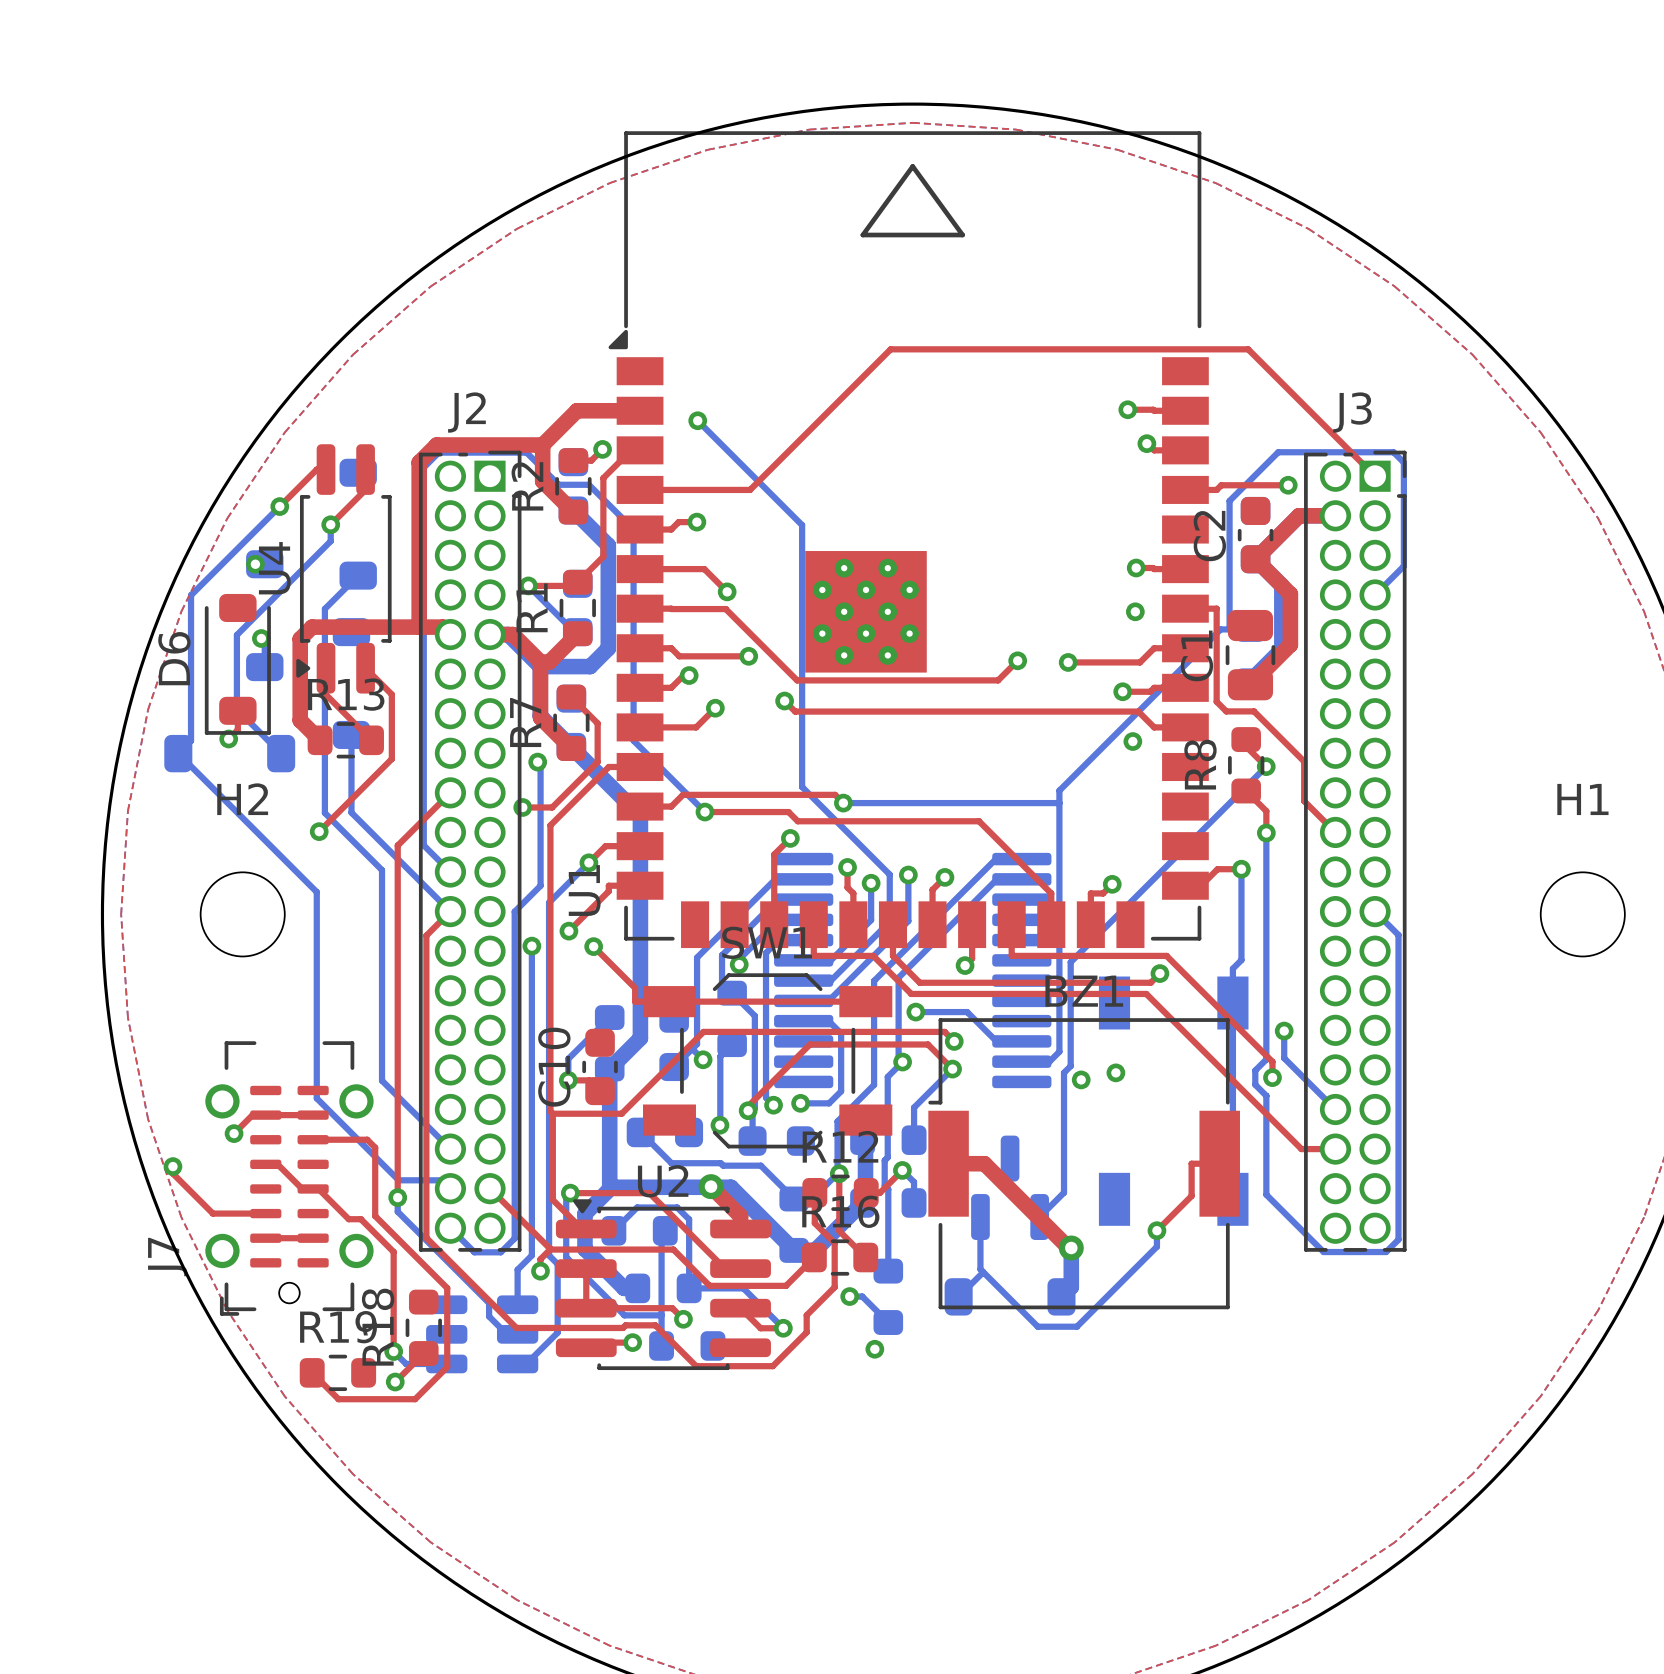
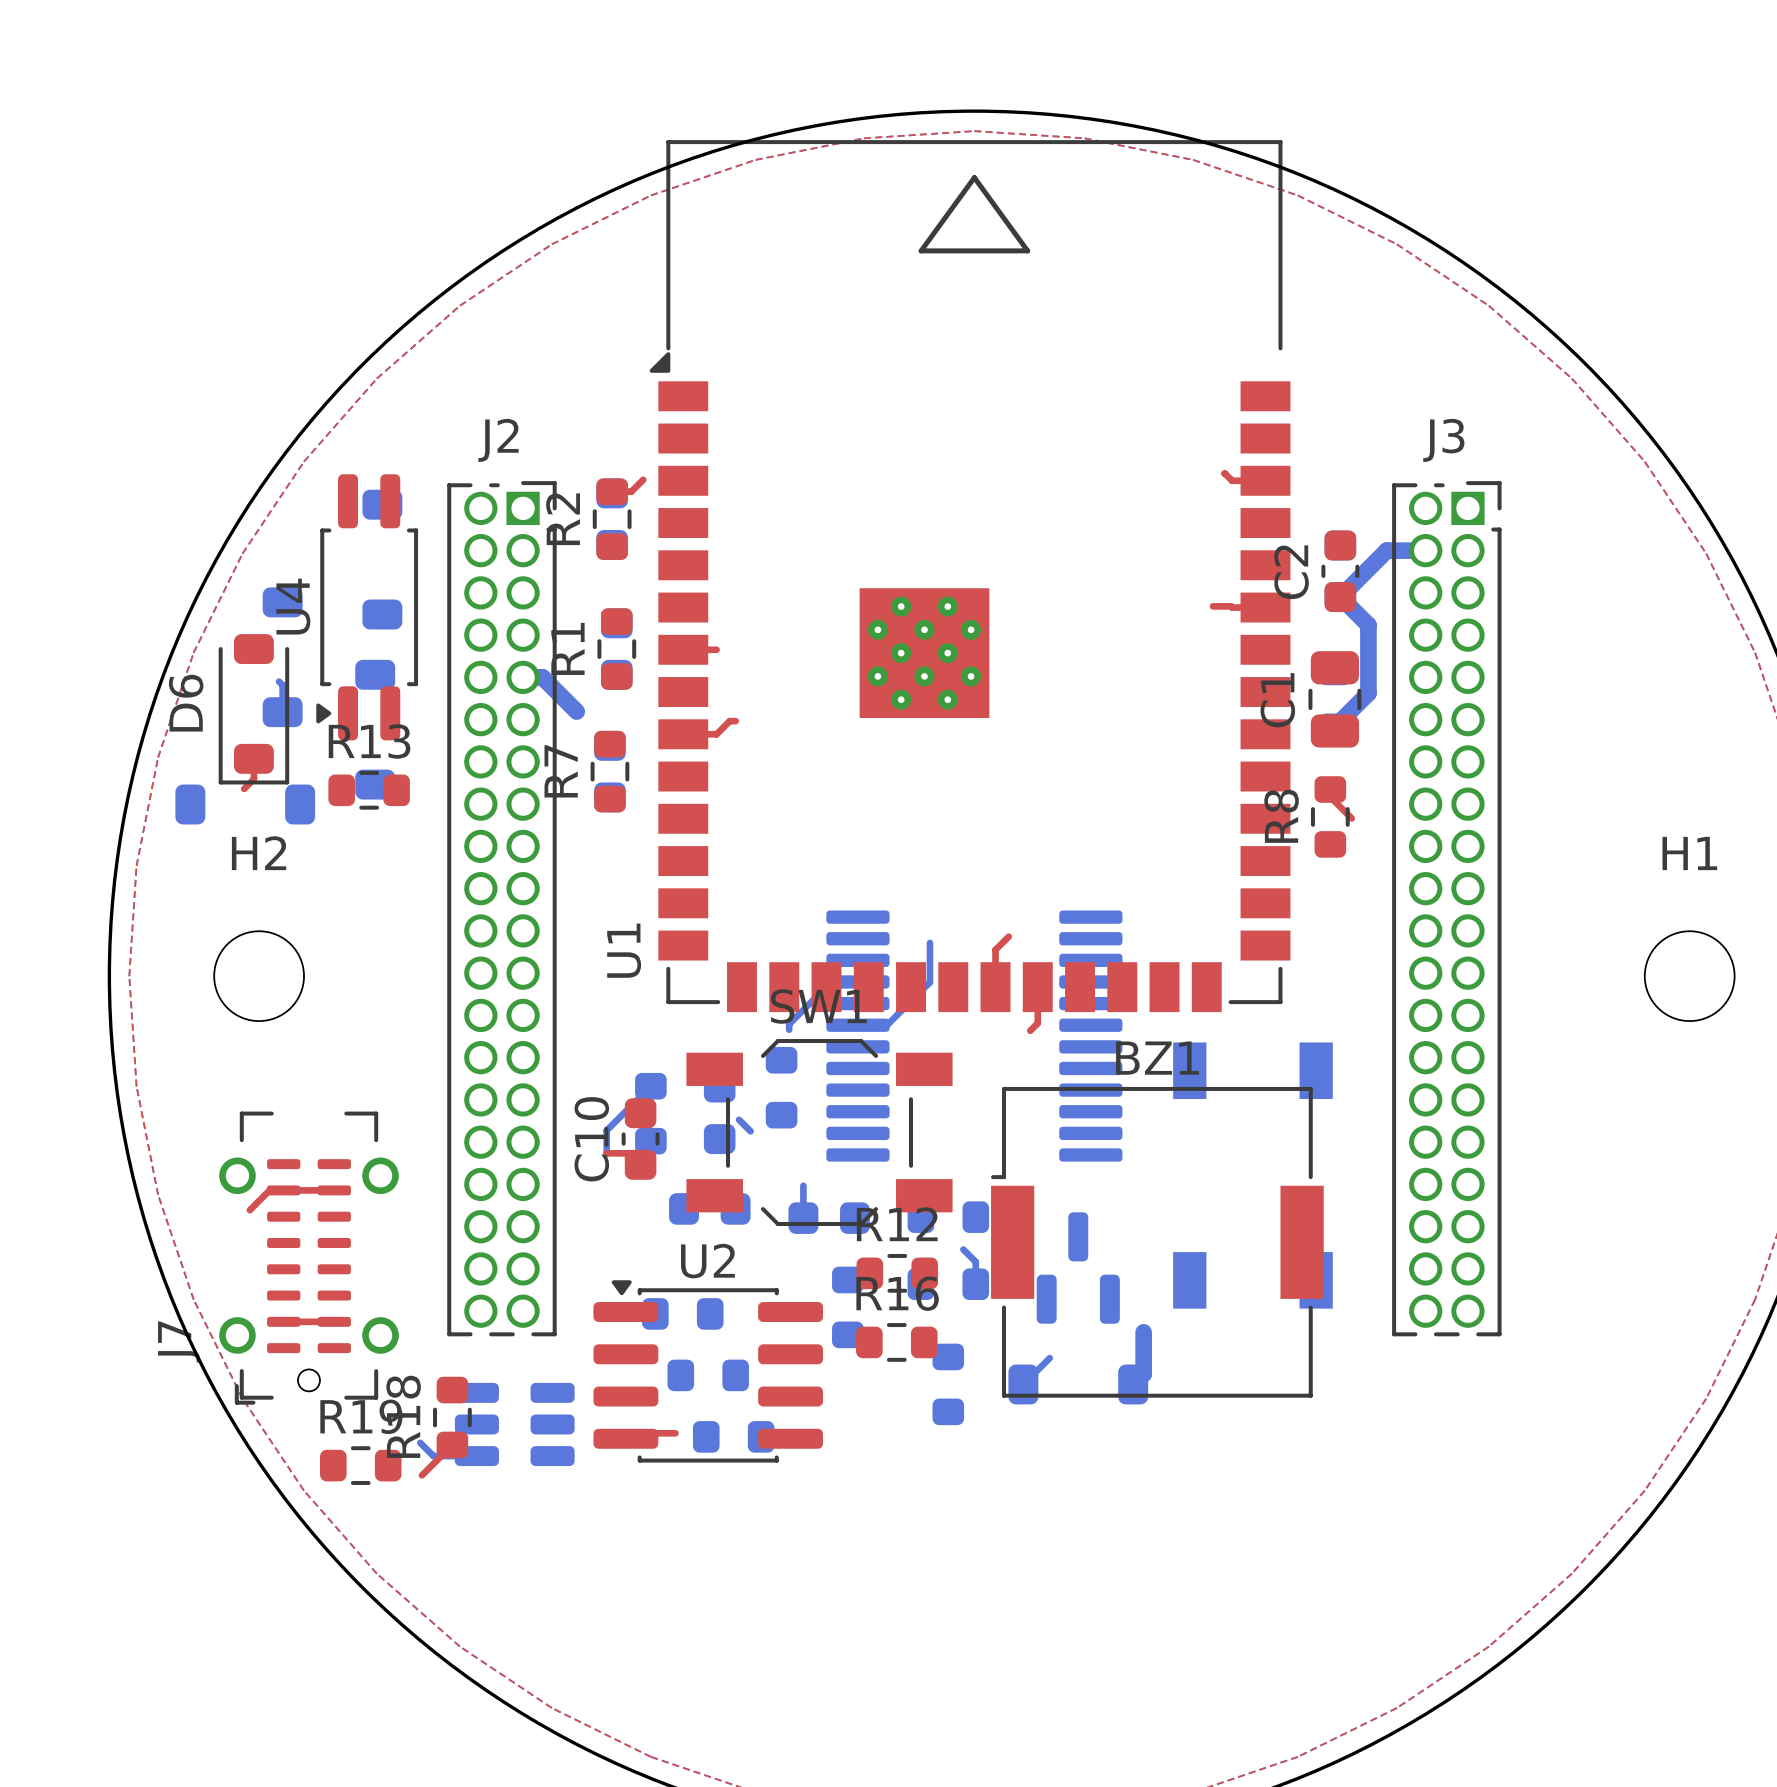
top track: (1127, 409) (1185, 410) -> none
via: (1127, 409) -> none
top track: (640, 410) (576, 410) (542, 445) (542, 481) (573, 512) -> none
bottom track: (697, 420) (802, 525) (802, 786) (889, 874) (889, 921) (830, 980) (803, 980) -> none
via: (697, 420) -> none
via: (1146, 443) -> none
top track: (542, 445) (436, 445) (419, 462) (419, 627) -> none
via: (602, 449) -> none
top track: (640, 450) (631, 450) (603, 478) (603, 556) (574, 585) (528, 585) -> none
top track: (326, 469) (316, 469) (279, 506) -> none
top track: (365, 469) (365, 489) (330, 524) -> none
top track: (1375, 476) (1248, 349) (890, 349) (750, 489) (640, 489) -> none
top track: (1288, 485) (1221, 485) (1216, 489) (1185, 489) -> none
via: (1288, 485) -> none
bottom track: (279, 506) (191, 595) (191, 740) (178, 753) (316, 892) (316, 1098) (398, 1180) (442, 1180) (450, 1188) -> none
via: (279, 506) -> none
bottom track: (573, 510) (608, 545) (608, 648) (590, 666) (540, 666) (540, 715) (640, 815) (640, 1038) (609, 1068) (609, 1189) (584, 1213) (584, 1249) (624, 1288) (637, 1288) -> none
top track: (1335, 515) (1299, 515) (1255, 559) (1290, 594) (1290, 644) (1250, 684) -> none
top track: (696, 522) (678, 522) (671, 529) (640, 529) -> none
via: (696, 522) -> none
bottom track: (330, 524) (330, 541) (236, 635) (236, 709) (281, 753) -> none
via: (330, 524) -> none
via: (255, 564) -> none
via: (1136, 568) -> none
top track: (640, 569) (704, 569) (727, 591) -> none
bottom track: (358, 575) (324, 608) (324, 813) (382, 870) (382, 1080) (450, 1149) -> none
bottom track: (528, 585) (574, 632) (577, 632) -> none
via: (528, 585) -> none
via: (727, 591) -> none
bottom track: (1375, 594) (1403, 566) (1403, 462) (1393, 452) (1278, 452) (1229, 500) (1229, 629) -> none
top track: (1185, 608) (1216, 608) (1216, 701) (1226, 711) (1254, 711) (1304, 761) (1304, 801) (1335, 832) -> none
top track: (671, 609) (725, 609) (797, 680) (998, 680) (1017, 660) -> none
via: (1135, 611) -> none
bottom track: (1250, 629) (1220, 629) (1059, 790) (1059, 1051) (1049, 1061) (1021, 1061) -> none
top track: (577, 633) (549, 662) (540, 662) -> none
top track: (450, 634) (442, 627) (312, 627) (300, 638) (300, 720) (320, 740) -> none
top track: (489, 634) (512, 634) (540, 662) -> none
via: (261, 638) -> none
top track: (640, 648) (671, 648) (679, 656) (748, 656) -> none
top track: (1185, 648) (1154, 648) (1140, 662) (1068, 662) -> none
via: (748, 656) -> none
via: (1017, 660) -> none
top track: (540, 662) (540, 717) (571, 748) -> none
via: (1068, 662) -> none
top track: (326, 668) (326, 694) (371, 740) -> none
top track: (365, 668) (391, 694) (391, 758) (319, 831) -> none
via: (689, 675) -> none
top track: (1185, 687) (1154, 687) (1150, 691) (1122, 691) -> none
via: (1122, 691) -> none
top track: (571, 697) (597, 723) (597, 762) (552, 807) (522, 807) -> none
top track: (784, 701) (795, 711) (1138, 711) (1154, 727) (1185, 727) -> none
via: (784, 701) -> none
top track: (715, 708) (696, 727) (640, 727) -> none
via: (715, 708) -> none
bottom track: (351, 734) (351, 812) (450, 911) -> none
via: (228, 739) -> none
via: (1132, 741) -> none
bottom track: (537, 762) (540, 764) (540, 885) (514, 911) (514, 1238) (500, 1252) (474, 1252) (450, 1228) -> none
via: (537, 762) -> none
top track: (640, 766) (608, 766) (550, 825) (550, 1111) (552, 1113) -> none
bottom track: (1266, 766) (1070, 962) (1070, 1066) (1064, 1072) (1064, 1192) (1039, 1217) -> none
via: (1266, 766) -> none
top track: (1246, 790) (1266, 811) (1266, 832) -> none
top track: (450, 792) (397, 845) (397, 1197) -> none
top track: (843, 803) (835, 794) (682, 794) (671, 806) (640, 806) -> none
bottom track: (843, 803) (1059, 803) -> none
via: (843, 803) -> none
via: (522, 807) -> none
top track: (704, 812) (788, 812) (797, 821) (979, 821) (1051, 893) (1051, 924) -> none
bottom track: (704, 812) (633, 740) (633, 529) (588, 484) (558, 484) (526, 452) (438, 452) (423, 467) (423, 845) (450, 872) -> none
via: (704, 812) -> none
via: (319, 831) -> none
bottom track: (1266, 832) (1266, 1059) (1255, 1070) (1255, 1084) (1266, 1095) (1266, 1194) (1323, 1252) (1386, 1252) (1398, 1239) (1398, 935) (1375, 911) -> none
via: (1266, 832) -> none
top track: (790, 838) (774, 854) (774, 924) -> none
via: (790, 838) -> none
top track: (640, 846) (605, 846) (588, 862) -> none
bottom track: (1021, 859) (995, 859) (874, 980) (874, 1084) (837, 1121) (837, 1173) -> none
bottom track: (588, 862) (549, 902) (549, 1255) (557, 1264) (557, 1332) (526, 1363) (517, 1363) -> none
via: (588, 862) -> none
top track: (847, 867) (847, 887) (853, 893) (853, 924) -> none
via: (847, 867) -> none
top track: (1241, 869) (1217, 869) (1201, 885) (1185, 885) -> none
bottom track: (1241, 869) (1241, 960) (1232, 968) (1232, 1199) -> none
via: (1241, 869) -> none
bottom track: (908, 875) (908, 921) (828, 1000) (803, 1000) -> none
via: (908, 875) -> none
via: (944, 877) -> none
bottom track: (803, 879) (775, 879) (697, 957) (697, 1044) (674, 1067) -> none
bottom track: (1021, 879) (996, 879) (898, 977) (898, 1058) (902, 1062) (887, 1076) (887, 1157) (884, 1160) (884, 1185) (888, 1189) (888, 1271) -> none
via: (871, 883) -> none
top track: (1112, 884) (1103, 893) (1090, 893) (1090, 924) -> none
via: (1112, 884) -> none
top track: (640, 885) (608, 885) (608, 891) (568, 931) -> none
bottom track: (803, 899) (777, 899) (722, 955) (722, 983) (754, 1015) (754, 1108) (748, 1110) -> none
top track: (450, 911) (426, 935) (426, 1237) (516, 1327) (623, 1327) (625, 1325) (655, 1325) (696, 1366) (772, 1366) (806, 1332) (806, 1315) (834, 1287) (834, 1243) (814, 1223) (814, 1192) -> none
top track: (813, 924) (813, 955) (873, 955) (911, 993) (1146, 993) (1301, 1149) (1335, 1149) -> none
top track: (892, 924) (892, 955) (919, 982) (1150, 982) (1159, 973) -> none
top track: (1011, 924) (1011, 955) (1166, 955) (1272, 1061) (1272, 1077) -> none
via: (568, 931) -> none
bottom track: (803, 940) (778, 940) (766, 952) (766, 1097) (773, 1105) -> none
bottom track: (531, 946) (531, 1255) (517, 1269) (517, 1304) -> none
via: (531, 946) -> none
top track: (593, 946) (635, 988) (635, 1001) (865, 1001) -> none
via: (593, 946) -> none
via: (739, 964) -> none
via: (965, 965) -> none
via: (1159, 973) -> none
bottom track: (915, 1012) (967, 1012) (996, 1041) (1021, 1041) -> none
via: (915, 1012) -> none
bottom track: (803, 1021) (828, 1021) (841, 1033) (841, 1091) (829, 1103) (800, 1103) -> none
bottom track: (1284, 1031) (1284, 1058) (1335, 1109) -> none
via: (1284, 1031) -> none
top track: (954, 1041) (944, 1031) (703, 1031) (621, 1113) (552, 1113) -> none
via: (954, 1041) -> none
bottom track: (732, 1044) (720, 1056) (720, 1124) -> none
via: (703, 1059) -> none
via: (902, 1062) -> none
top track: (952, 1069) (928, 1044) (809, 1044) (748, 1106) (748, 1110) -> none
bottom track: (952, 1069) (914, 1107) (914, 1140) -> none
via: (952, 1069) -> none
via: (1115, 1072) -> none
via: (1272, 1077) -> none
via: (1081, 1079) -> none
via: (568, 1080) -> none
via: (800, 1103) -> none
via: (773, 1105) -> none
via: (748, 1110) -> none
top track: (552, 1113) (552, 1199) (581, 1229) (586, 1229) -> none
via: (719, 1125) -> none
bottom track: (640, 1132) (671, 1163) (760, 1165) (794, 1198) (812, 1198) (837, 1173) -> none
via: (234, 1133) -> none
top track: (313, 1139) (367, 1139) (375, 1147) (375, 1216) (447, 1288) (447, 1367) (415, 1399) (338, 1399) (312, 1372) -> none
bottom track: (862, 1140) (865, 1143) (865, 1200) (815, 1250) (794, 1250) (731, 1187) (609, 1187) -> none
top track: (948, 1163) (984, 1163) (1068, 1248) (1071, 1248) -> none
top track: (1219, 1163) (1191, 1163) (1191, 1196) (1156, 1230) -> none
top track: (265, 1164) (277, 1164) (302, 1188) (318, 1188) (348, 1219) (360, 1219) (393, 1251) (393, 1351) -> none
top track: (172, 1166) (172, 1173) (212, 1213) (265, 1213) -> none
via: (172, 1166) -> none
top track: (902, 1170) (880, 1192) (866, 1192) -> none
via: (902, 1170) -> none
top track: (839, 1173) (839, 1231) (865, 1257) -> none
via: (839, 1173) -> none
top track: (711, 1186) (740, 1216) (740, 1229) -> none
via: (711, 1186) -> none
top track: (489, 1188) (550, 1249) -> none
top track: (570, 1193) (649, 1193) (724, 1268) (740, 1268) -> none
bottom track: (570, 1193) (566, 1197) (566, 1257) (624, 1315) (661, 1315) -> none
via: (570, 1193) -> none
bottom track: (397, 1197) (397, 1211) (489, 1303) (489, 1316) (506, 1334) (517, 1334) -> none
via: (397, 1197) -> none
bottom track: (980, 1217) (980, 1269) (1037, 1326) (1076, 1326) (1156, 1246) (1156, 1230) -> none
bottom track: (613, 1230) (637, 1207) (677, 1207) (689, 1219) (689, 1288) (743, 1288) (783, 1328) -> none
bottom track: (665, 1230) (661, 1234) (661, 1345) -> none
via: (1156, 1230) -> none
via: (1071, 1248) -> none
top track: (550, 1249) (540, 1259) (540, 1271) -> none
top track: (550, 1249) (673, 1249) (709, 1285) (786, 1285) (814, 1257) -> none
top track: (586, 1268) (586, 1308) (672, 1308) (683, 1319) -> none
via: (540, 1271) -> none
bottom track: (849, 1296) (862, 1296) (888, 1322) -> none
via: (849, 1296) -> none
top track: (740, 1308) (760, 1328) (783, 1328) -> none
via: (683, 1319) -> none
via: (783, 1328) -> none
via: (632, 1342) -> none
via: (874, 1349) -> none
via: (393, 1351) -> none
via: (395, 1382) -> none

